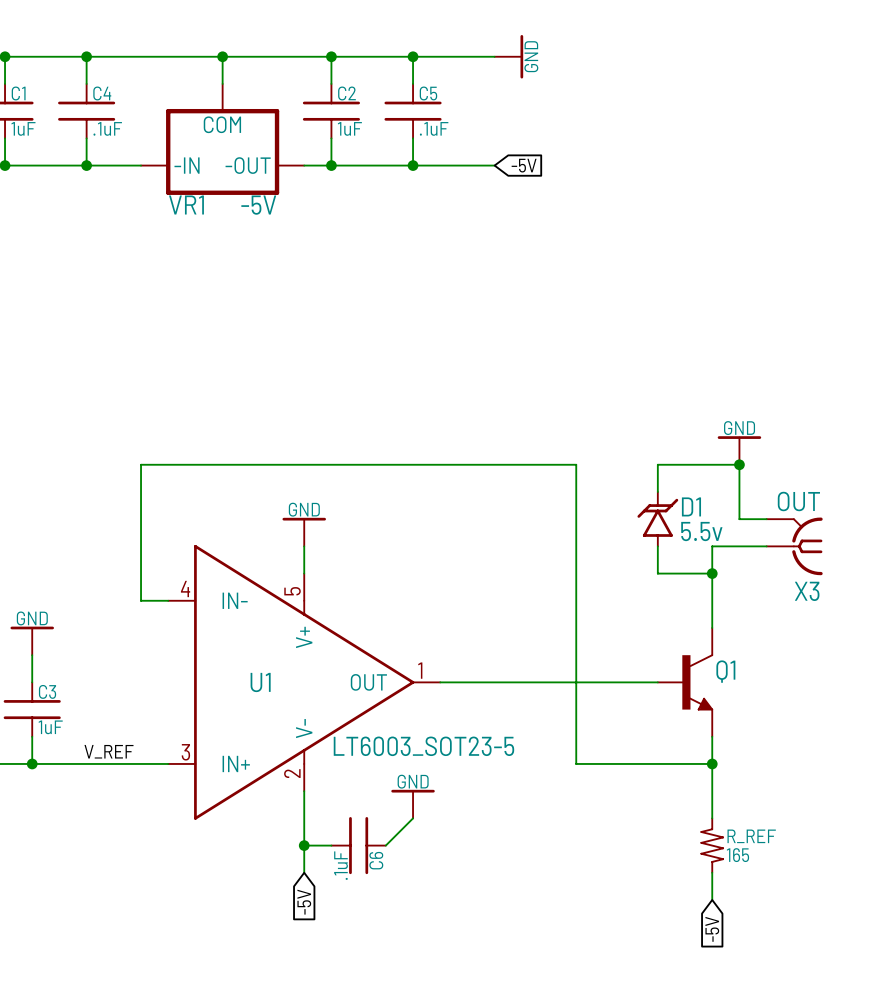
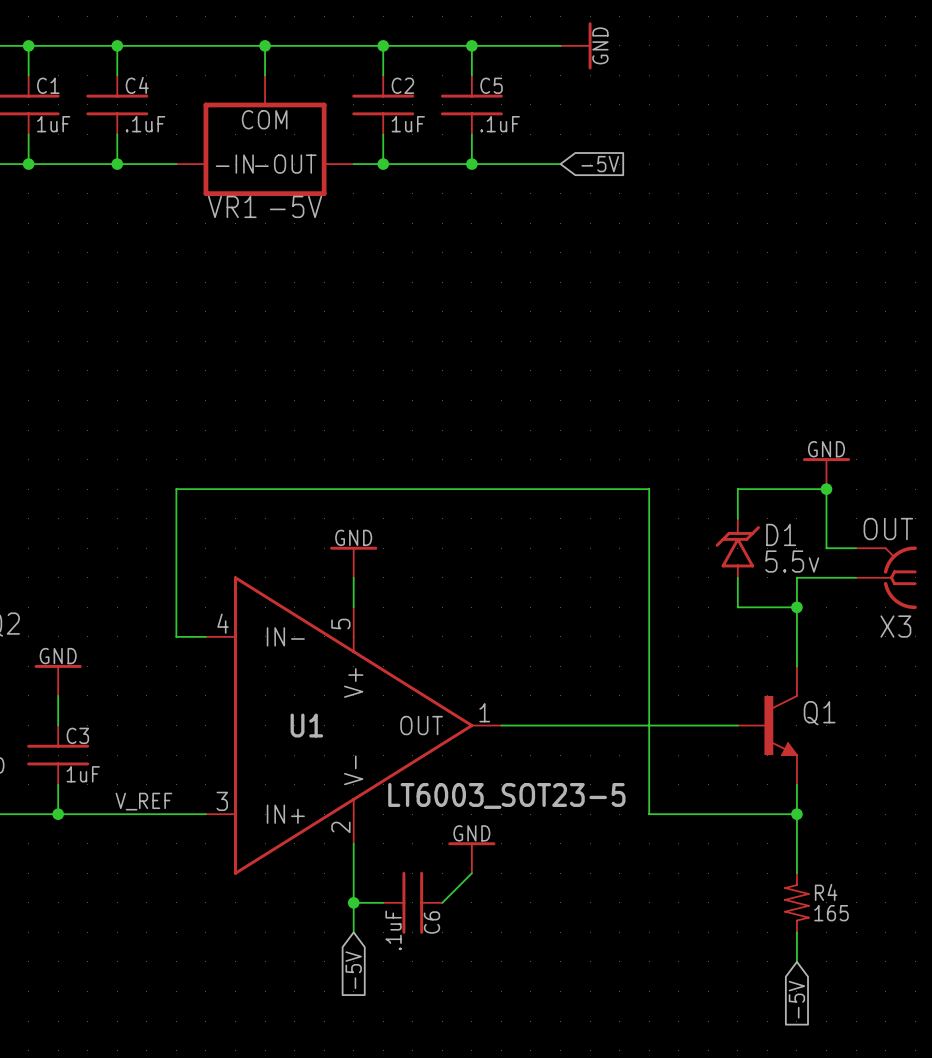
R_REF name: R_REF (751, 836) -> R4 (826, 892)

